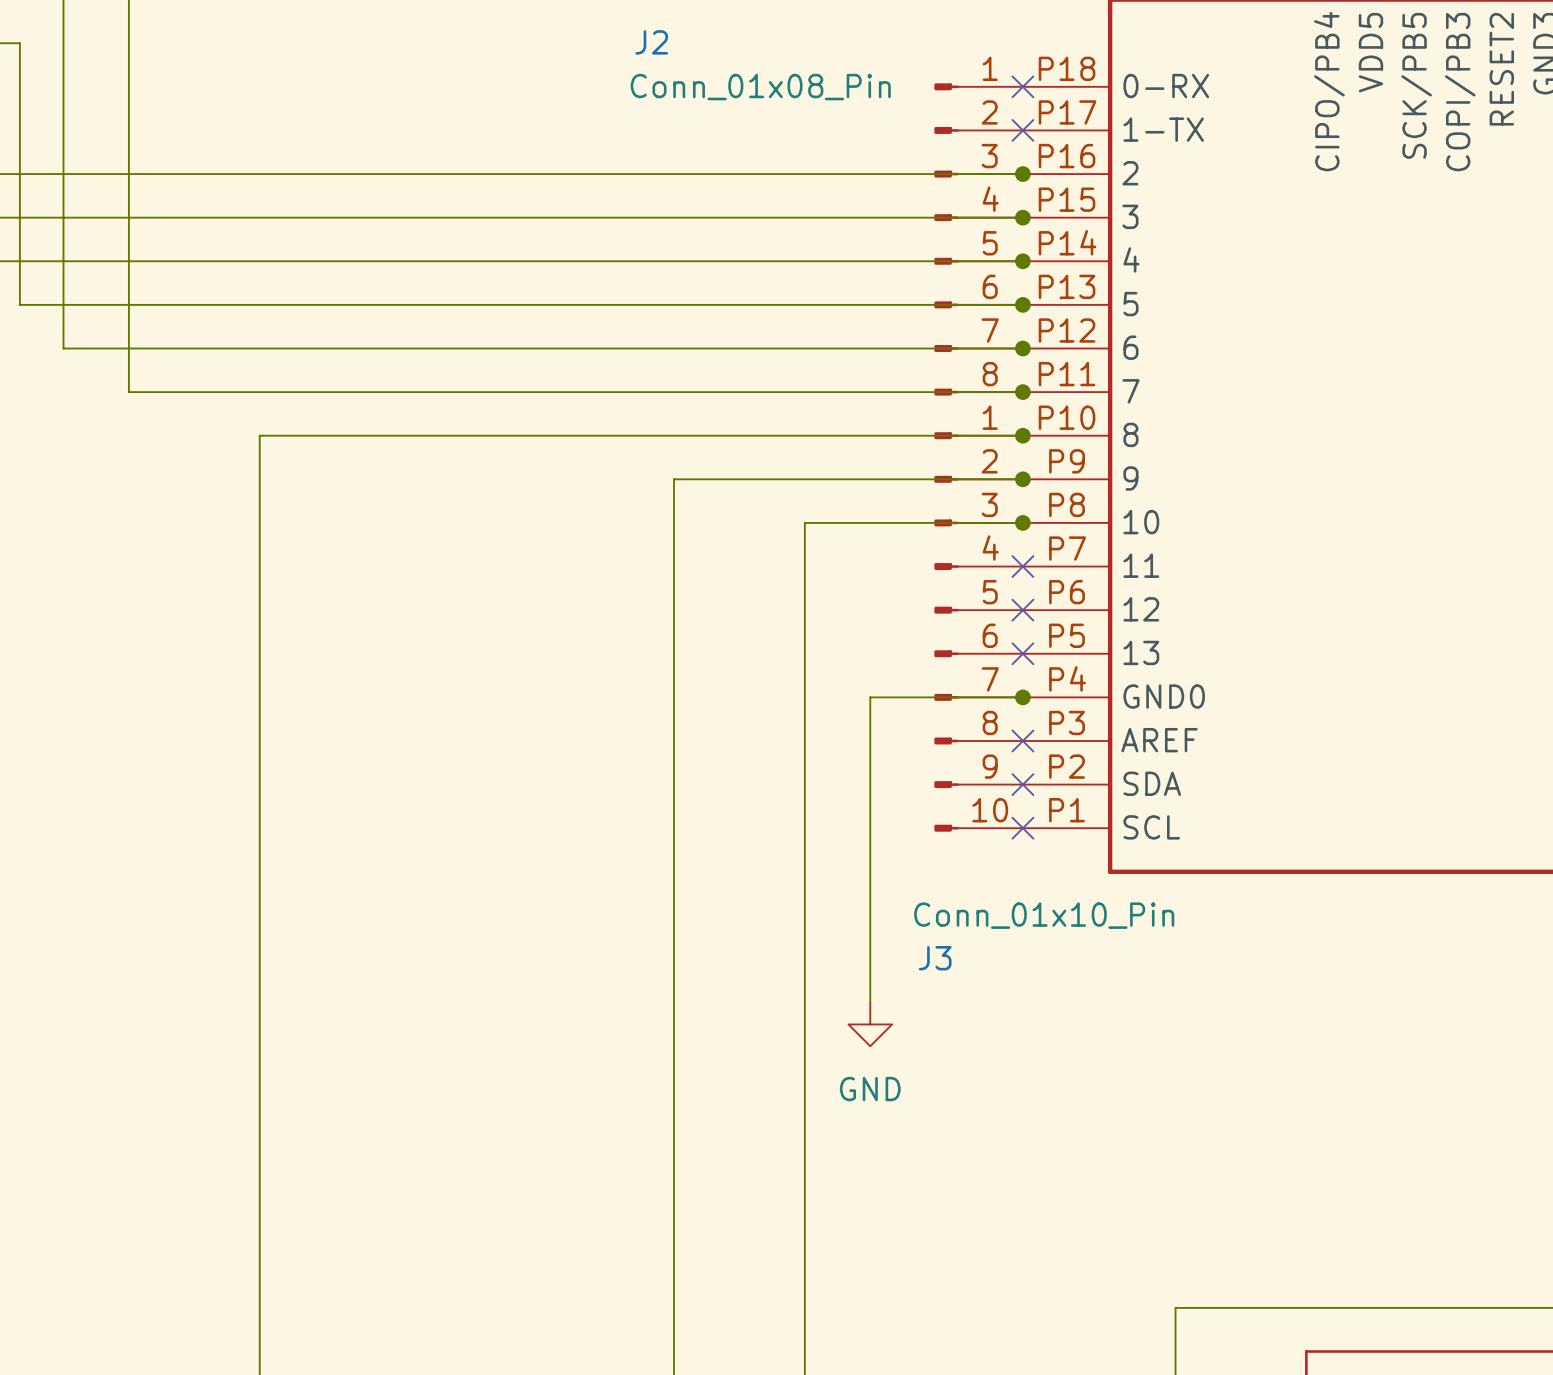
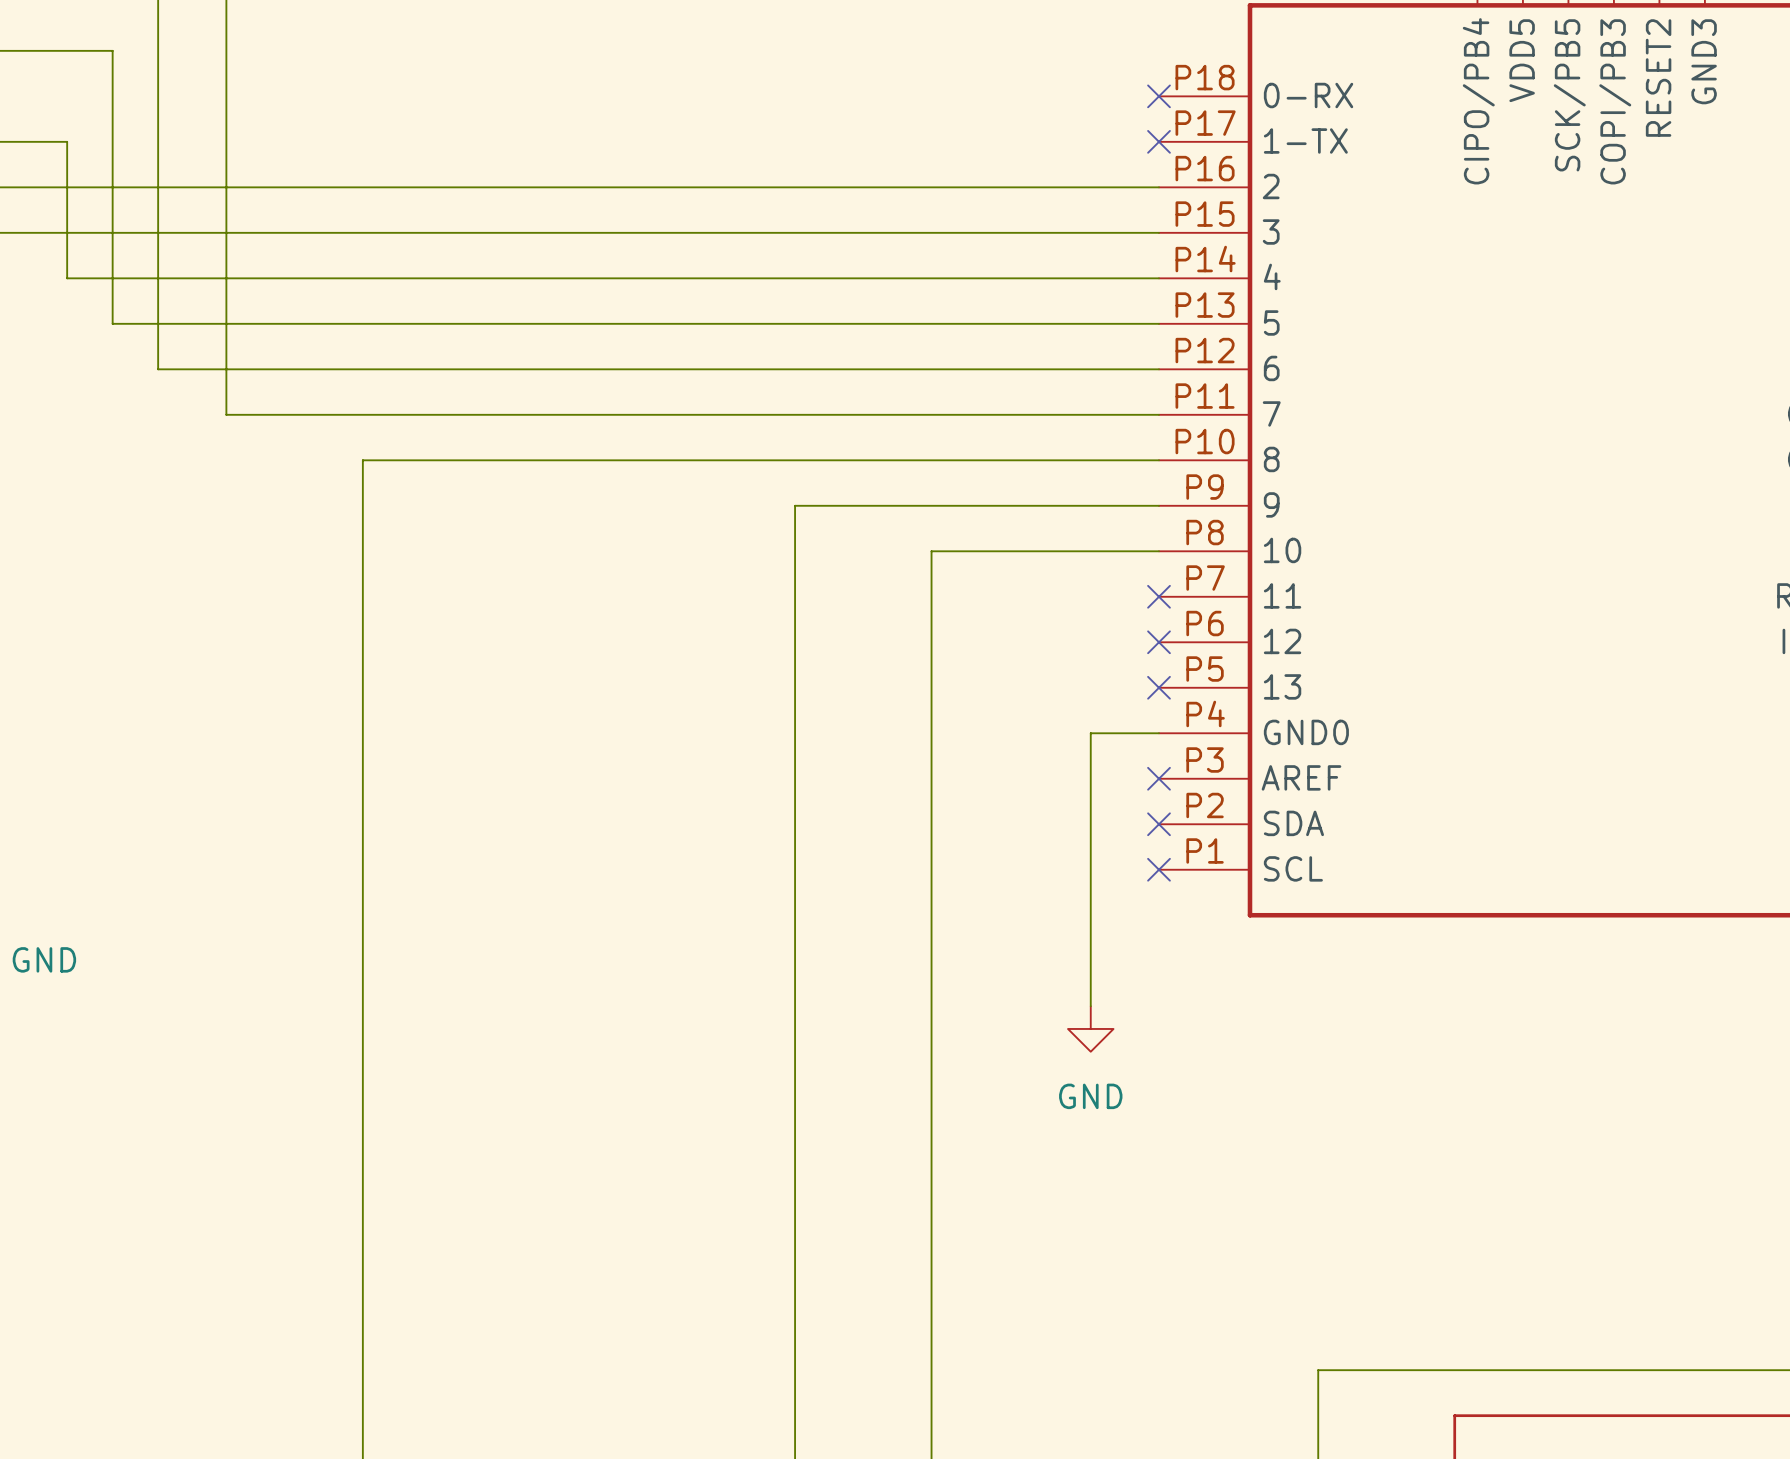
junction: (1022, 174) -> none
junction: (1022, 217) -> none
J2: Conn_01x08_Pin (978, 239) -> none
junction: (1022, 261) -> none
junction: (1022, 304) -> none
junction: (1022, 348) -> none
junction: (1022, 392) -> none
junction: (1022, 435) -> none
junction: (1022, 479) -> none
junction: (1022, 522) -> none
J3: Conn_01x10_Pin (978, 631) -> none
wire: (957, 697) (870, 697) (870, 1002) -> (1090, 733) (1090, 1006)
junction: (1022, 697) -> none
power symbol position: GND (870, 1024) -> GND (1090, 1028)

